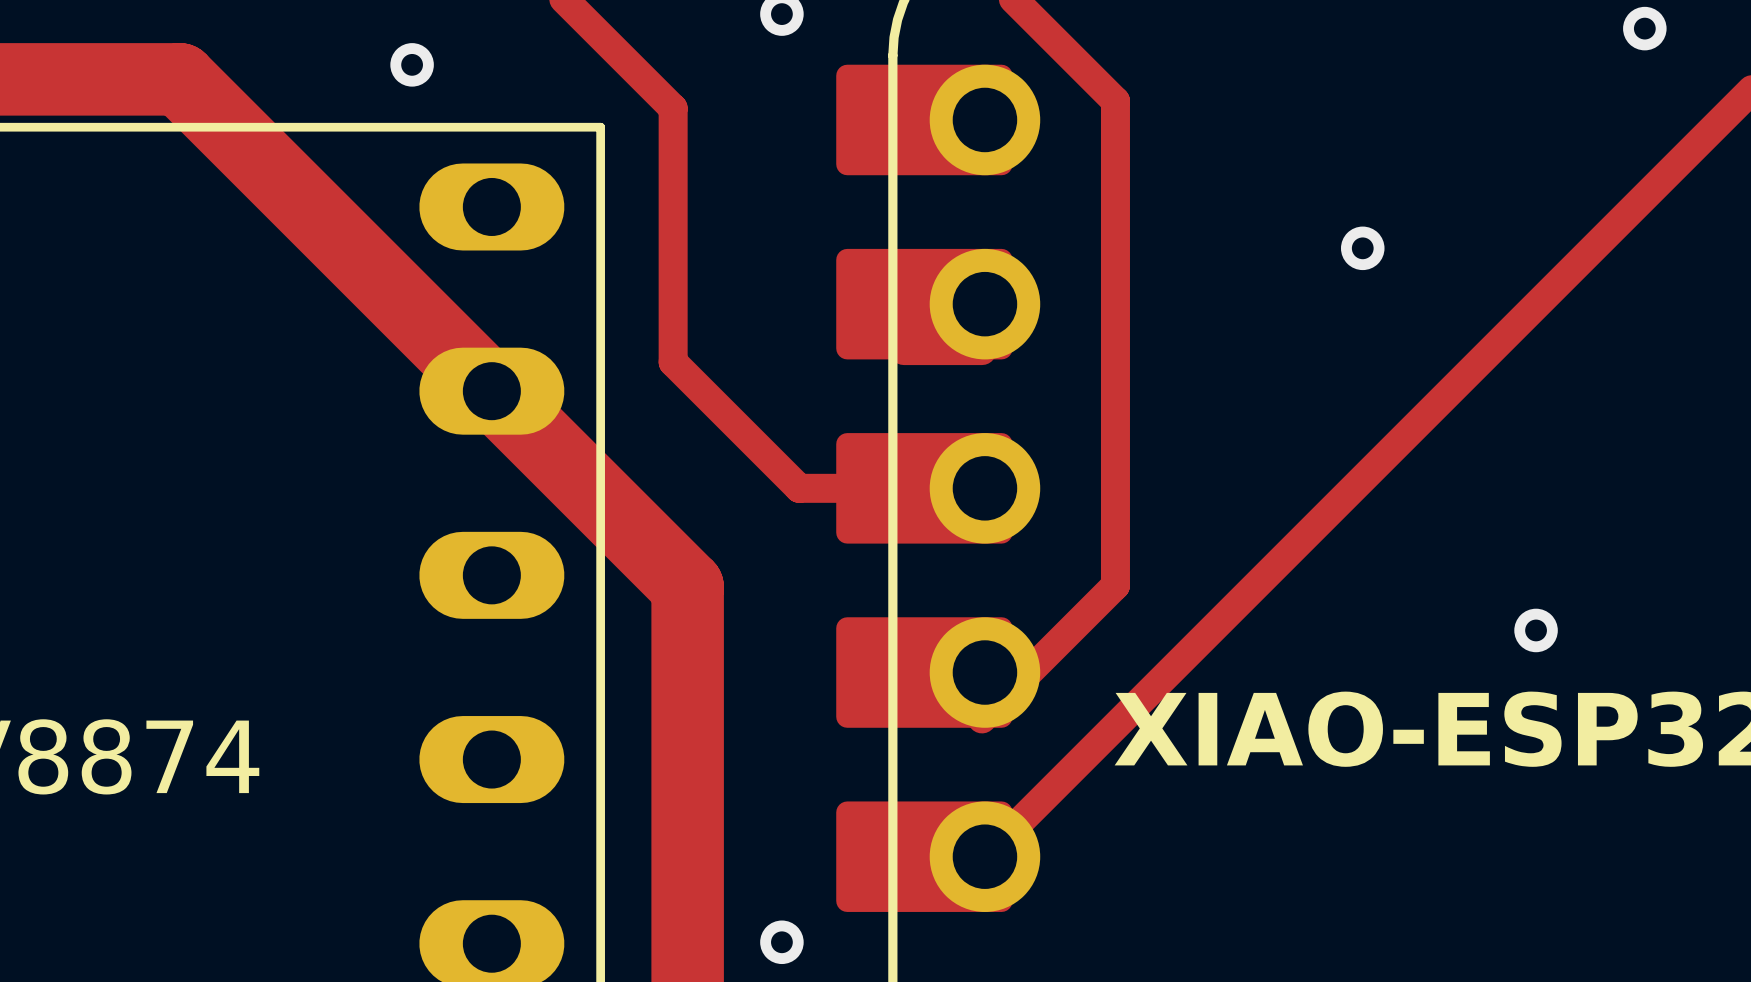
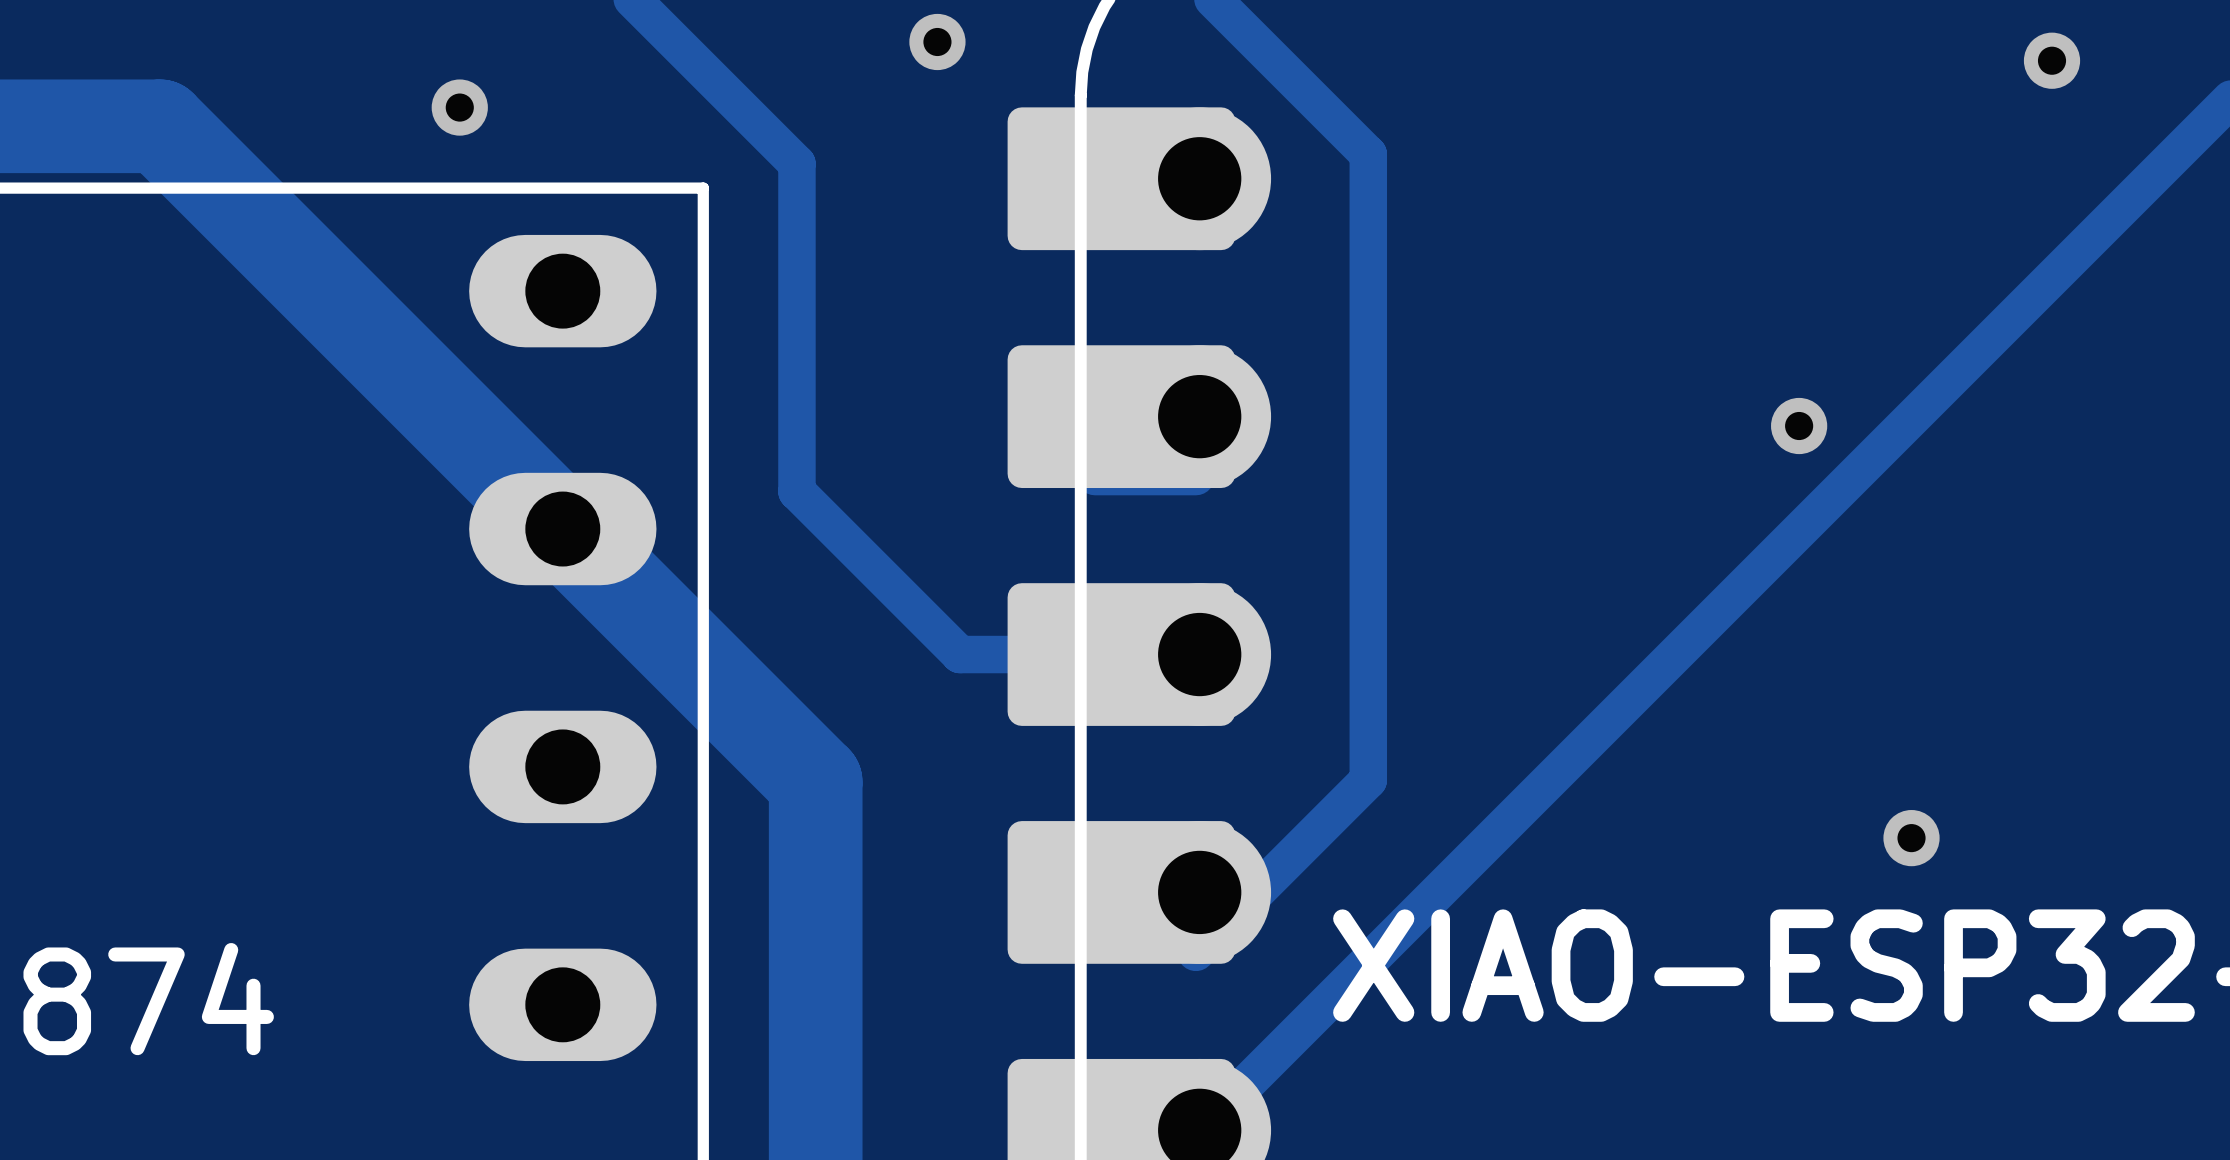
via position: (1362, 248) -> (1799, 426)

